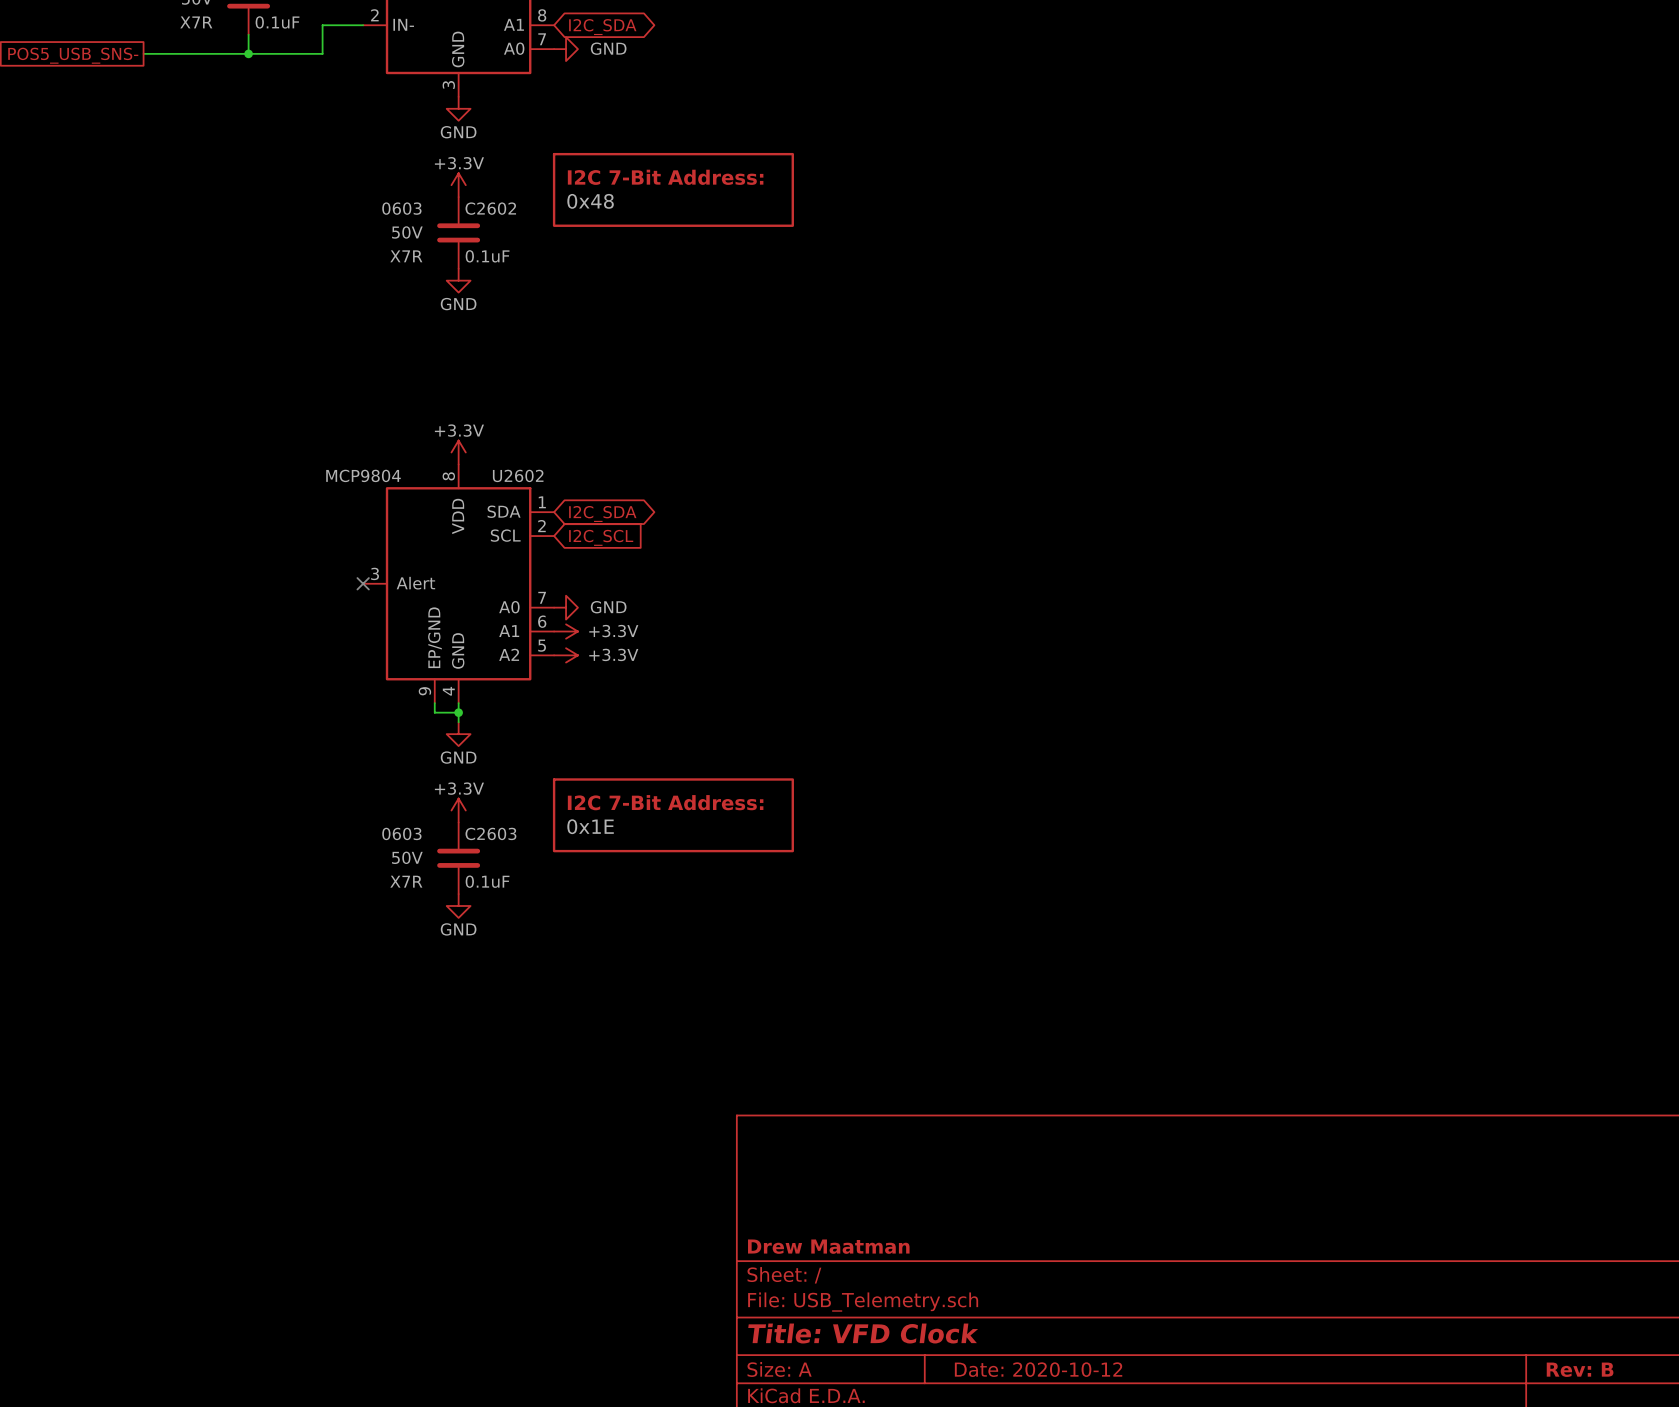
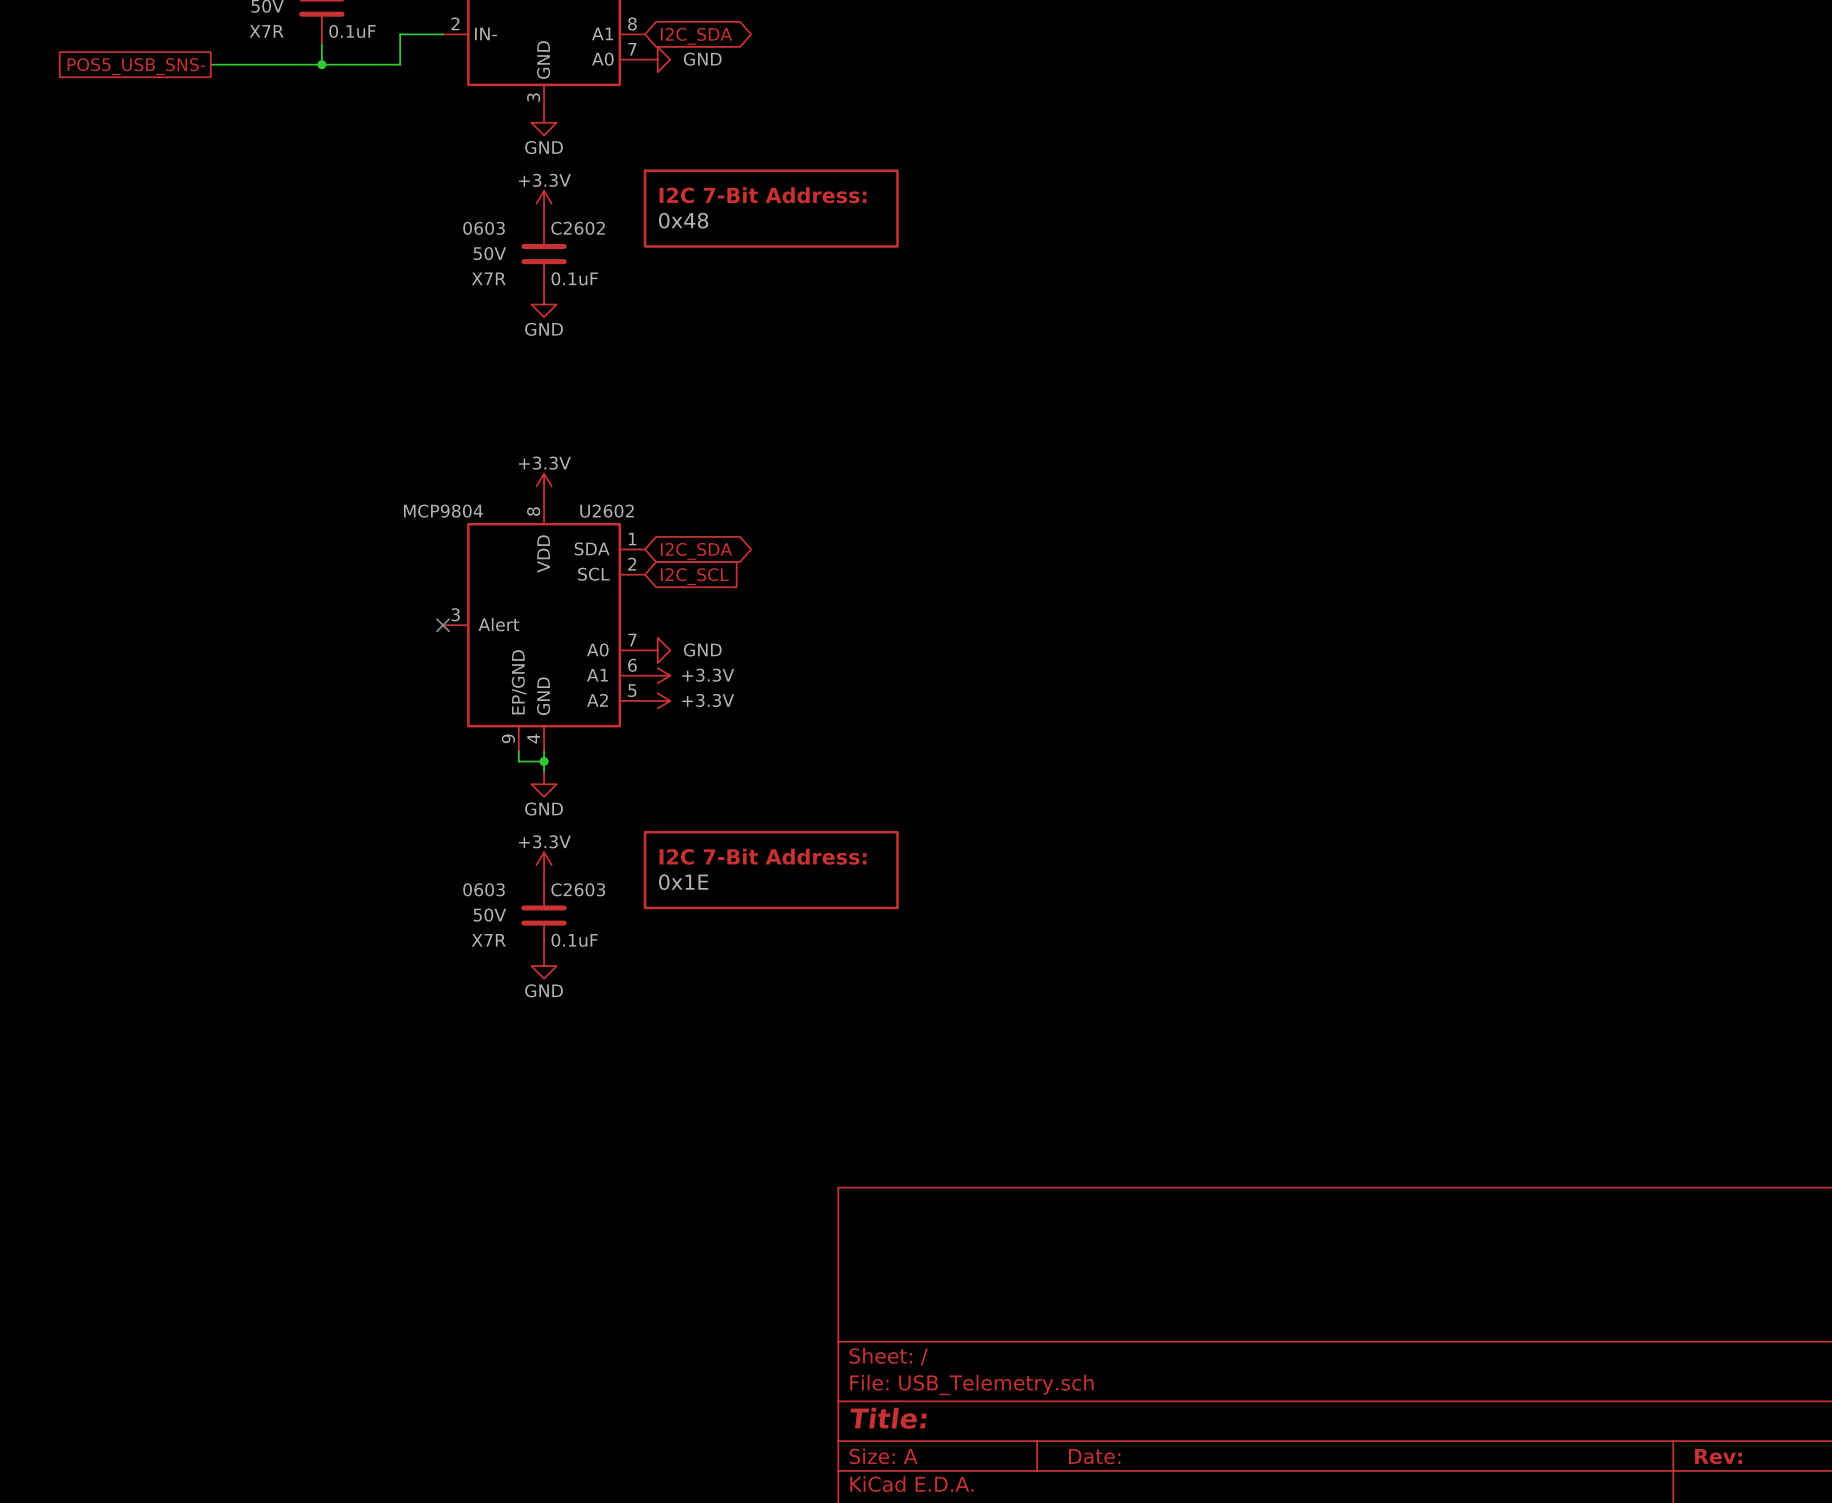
title block: Drew Maatman (828, 1246) -> none
title block: Title: VFD Clock (863, 1333) -> Title: (888, 1418)
title block: Date: 2020-10-12 (1038, 1369) -> Date: (1094, 1456)
title block: Rev: B (1580, 1369) -> Rev: (1718, 1456)

